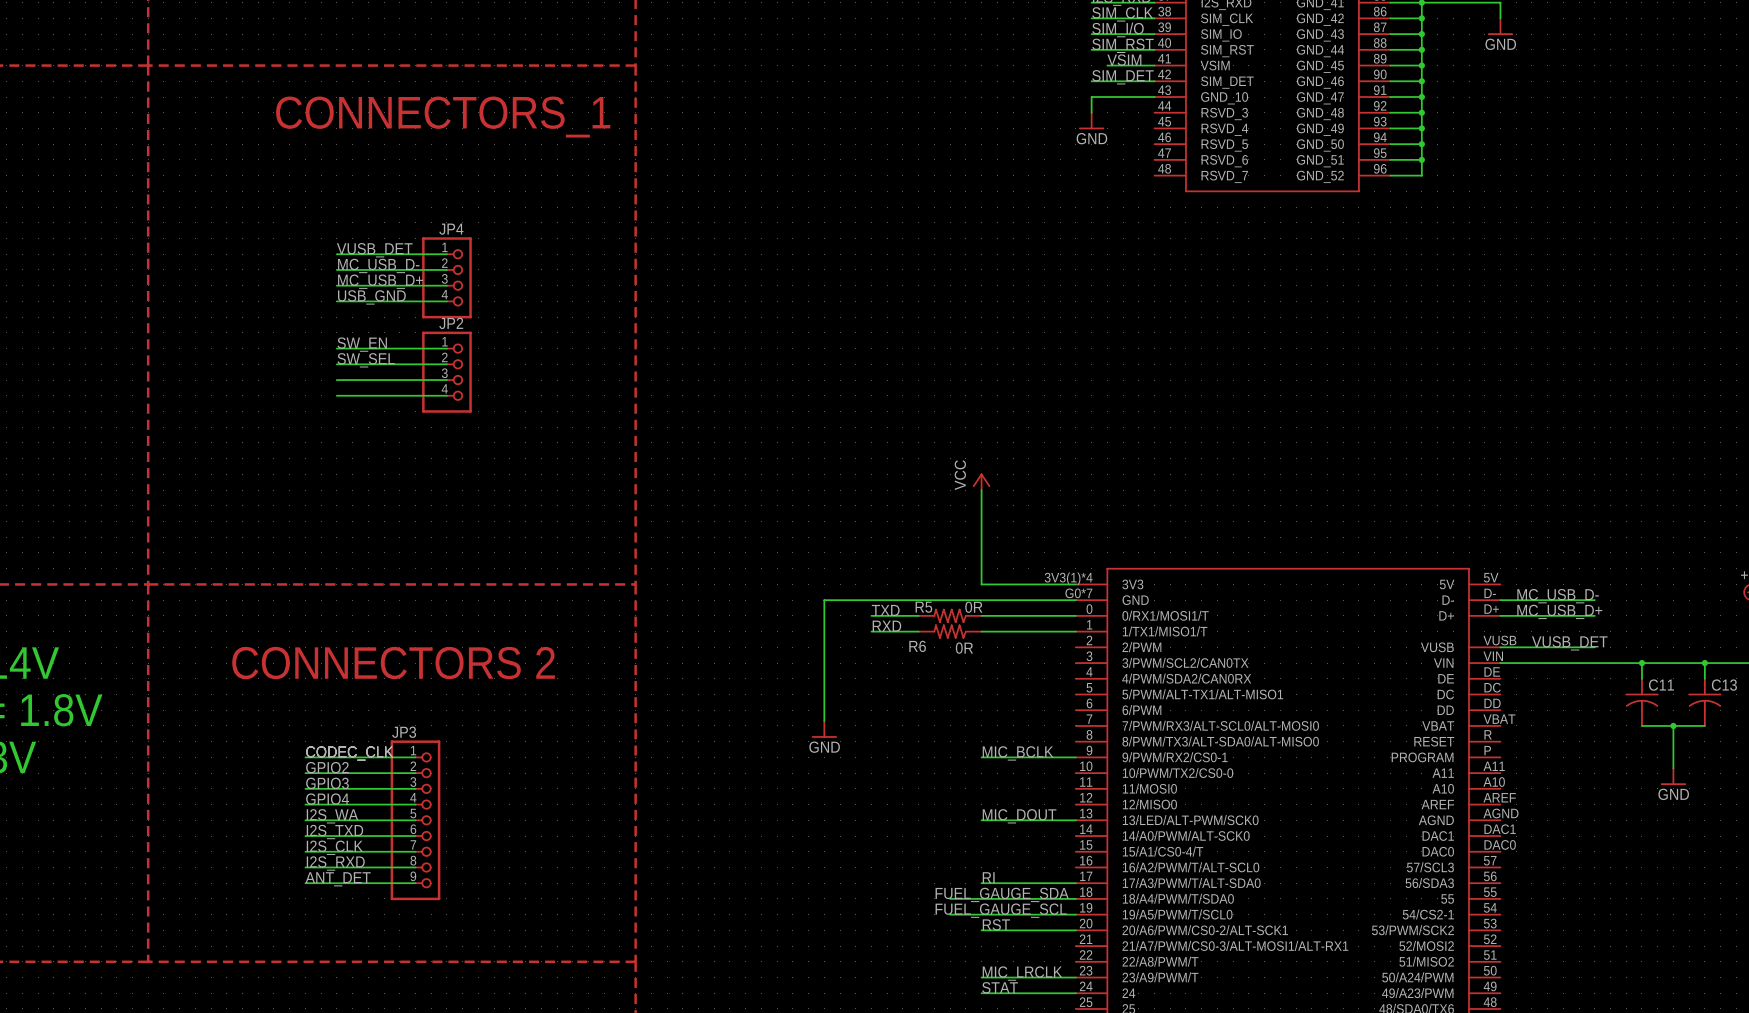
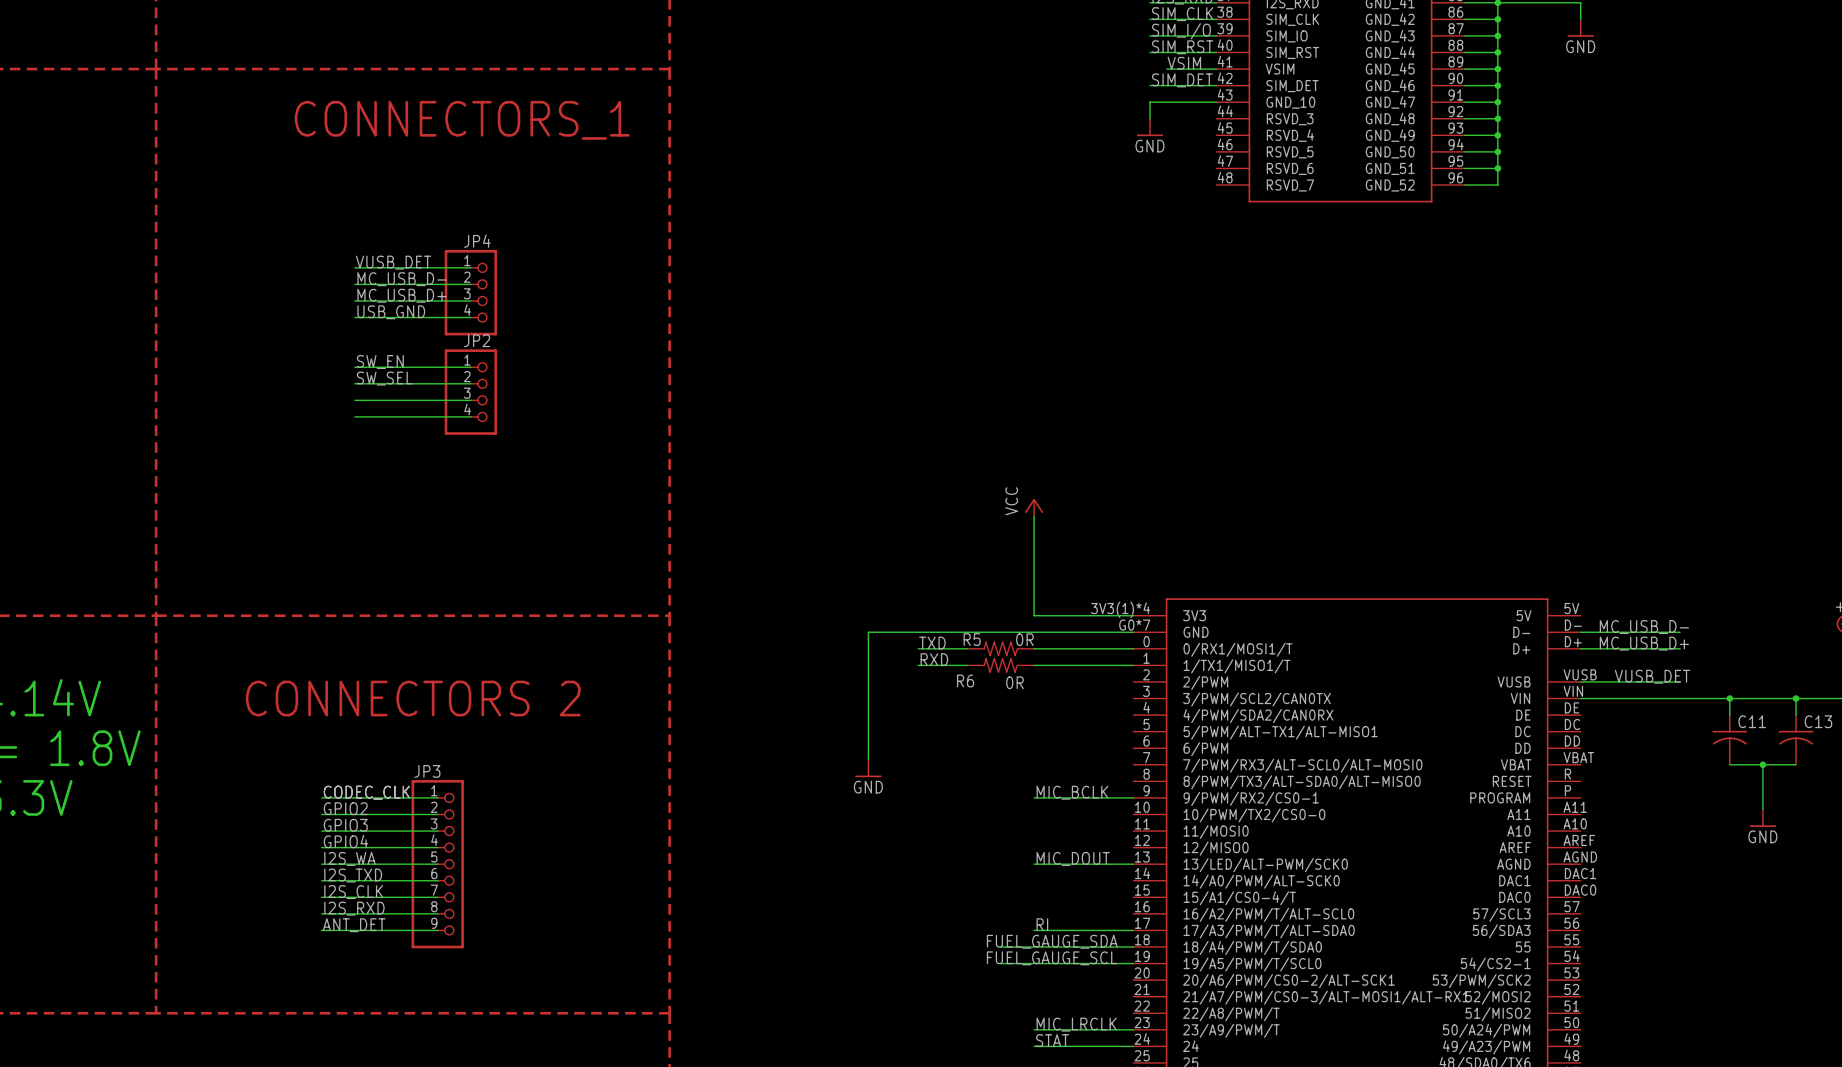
label: RST (996, 924) -> none
wire: (981, 930) (1075, 930) -> none

